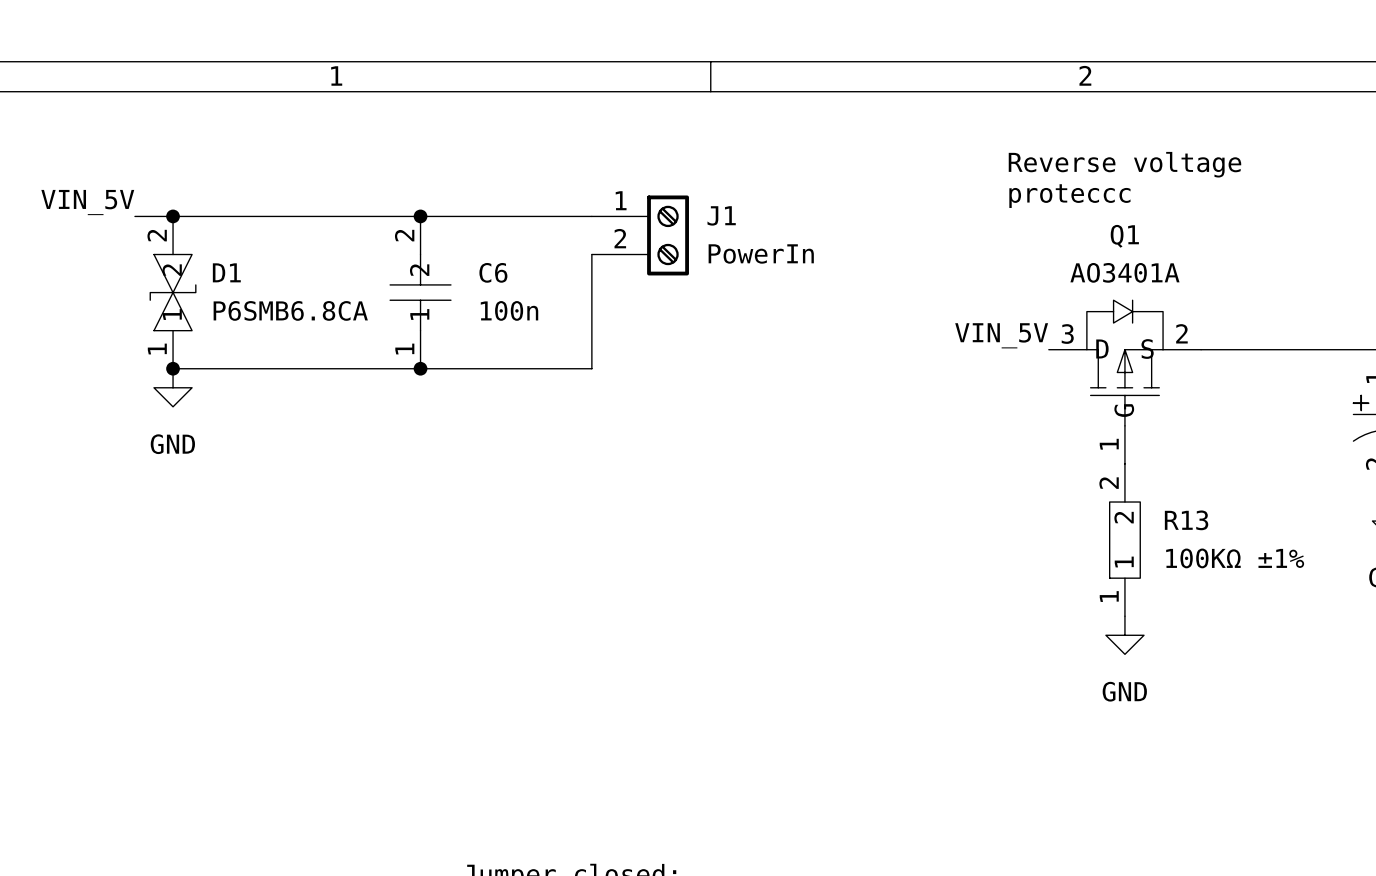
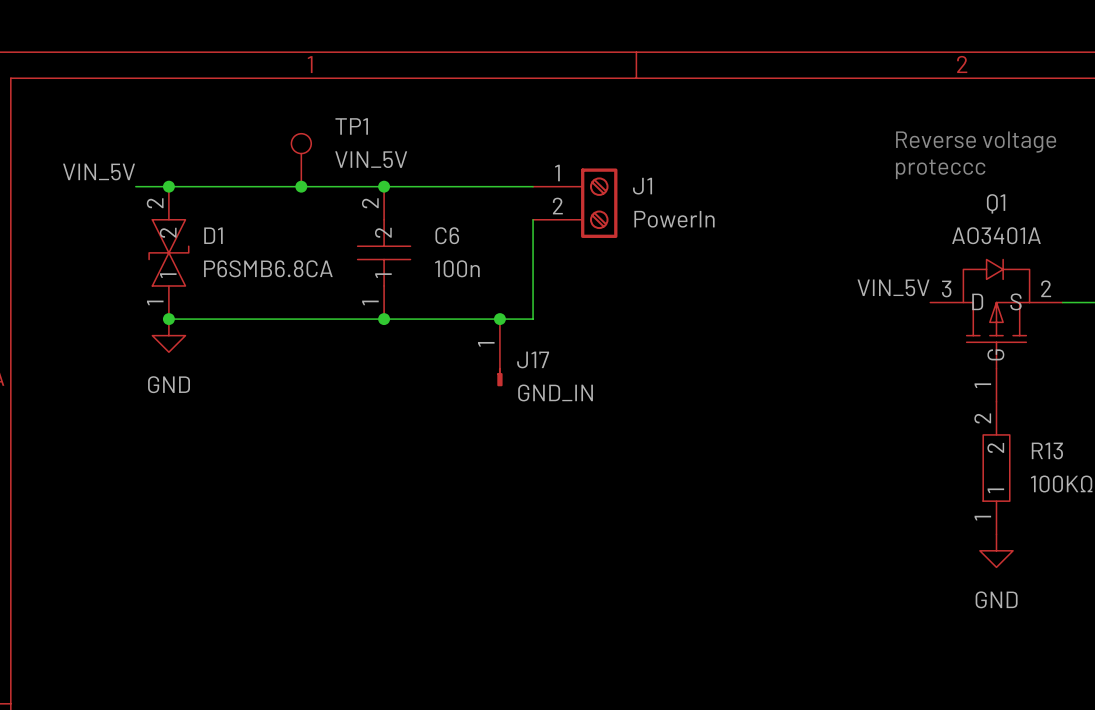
TP1: none -> VIN_5V (301, 160)
junction: none -> (301, 186)
junction: none -> (499, 319)
J17: none -> GND_IN (499, 352)

